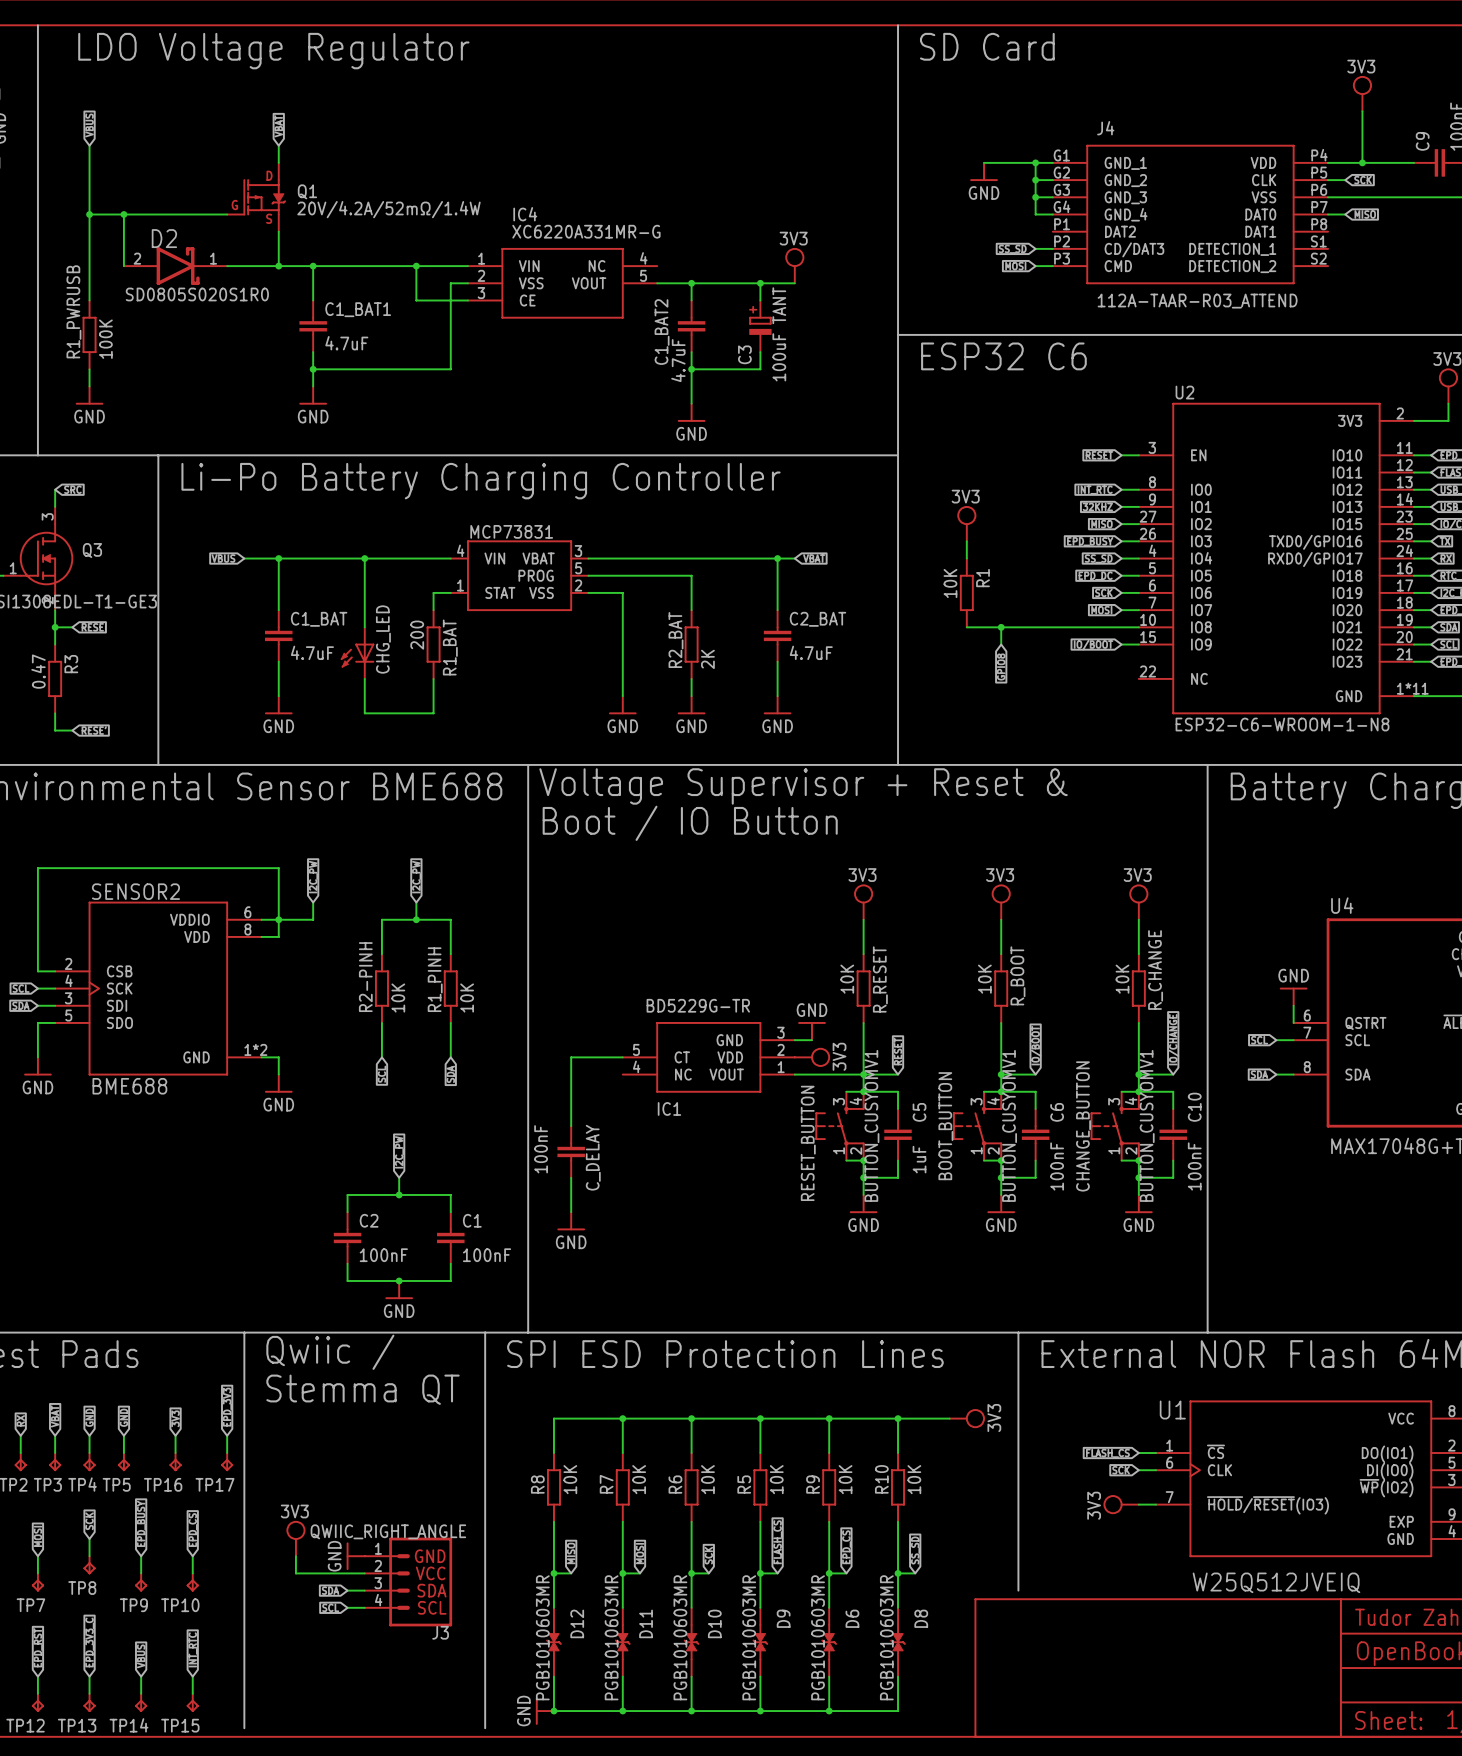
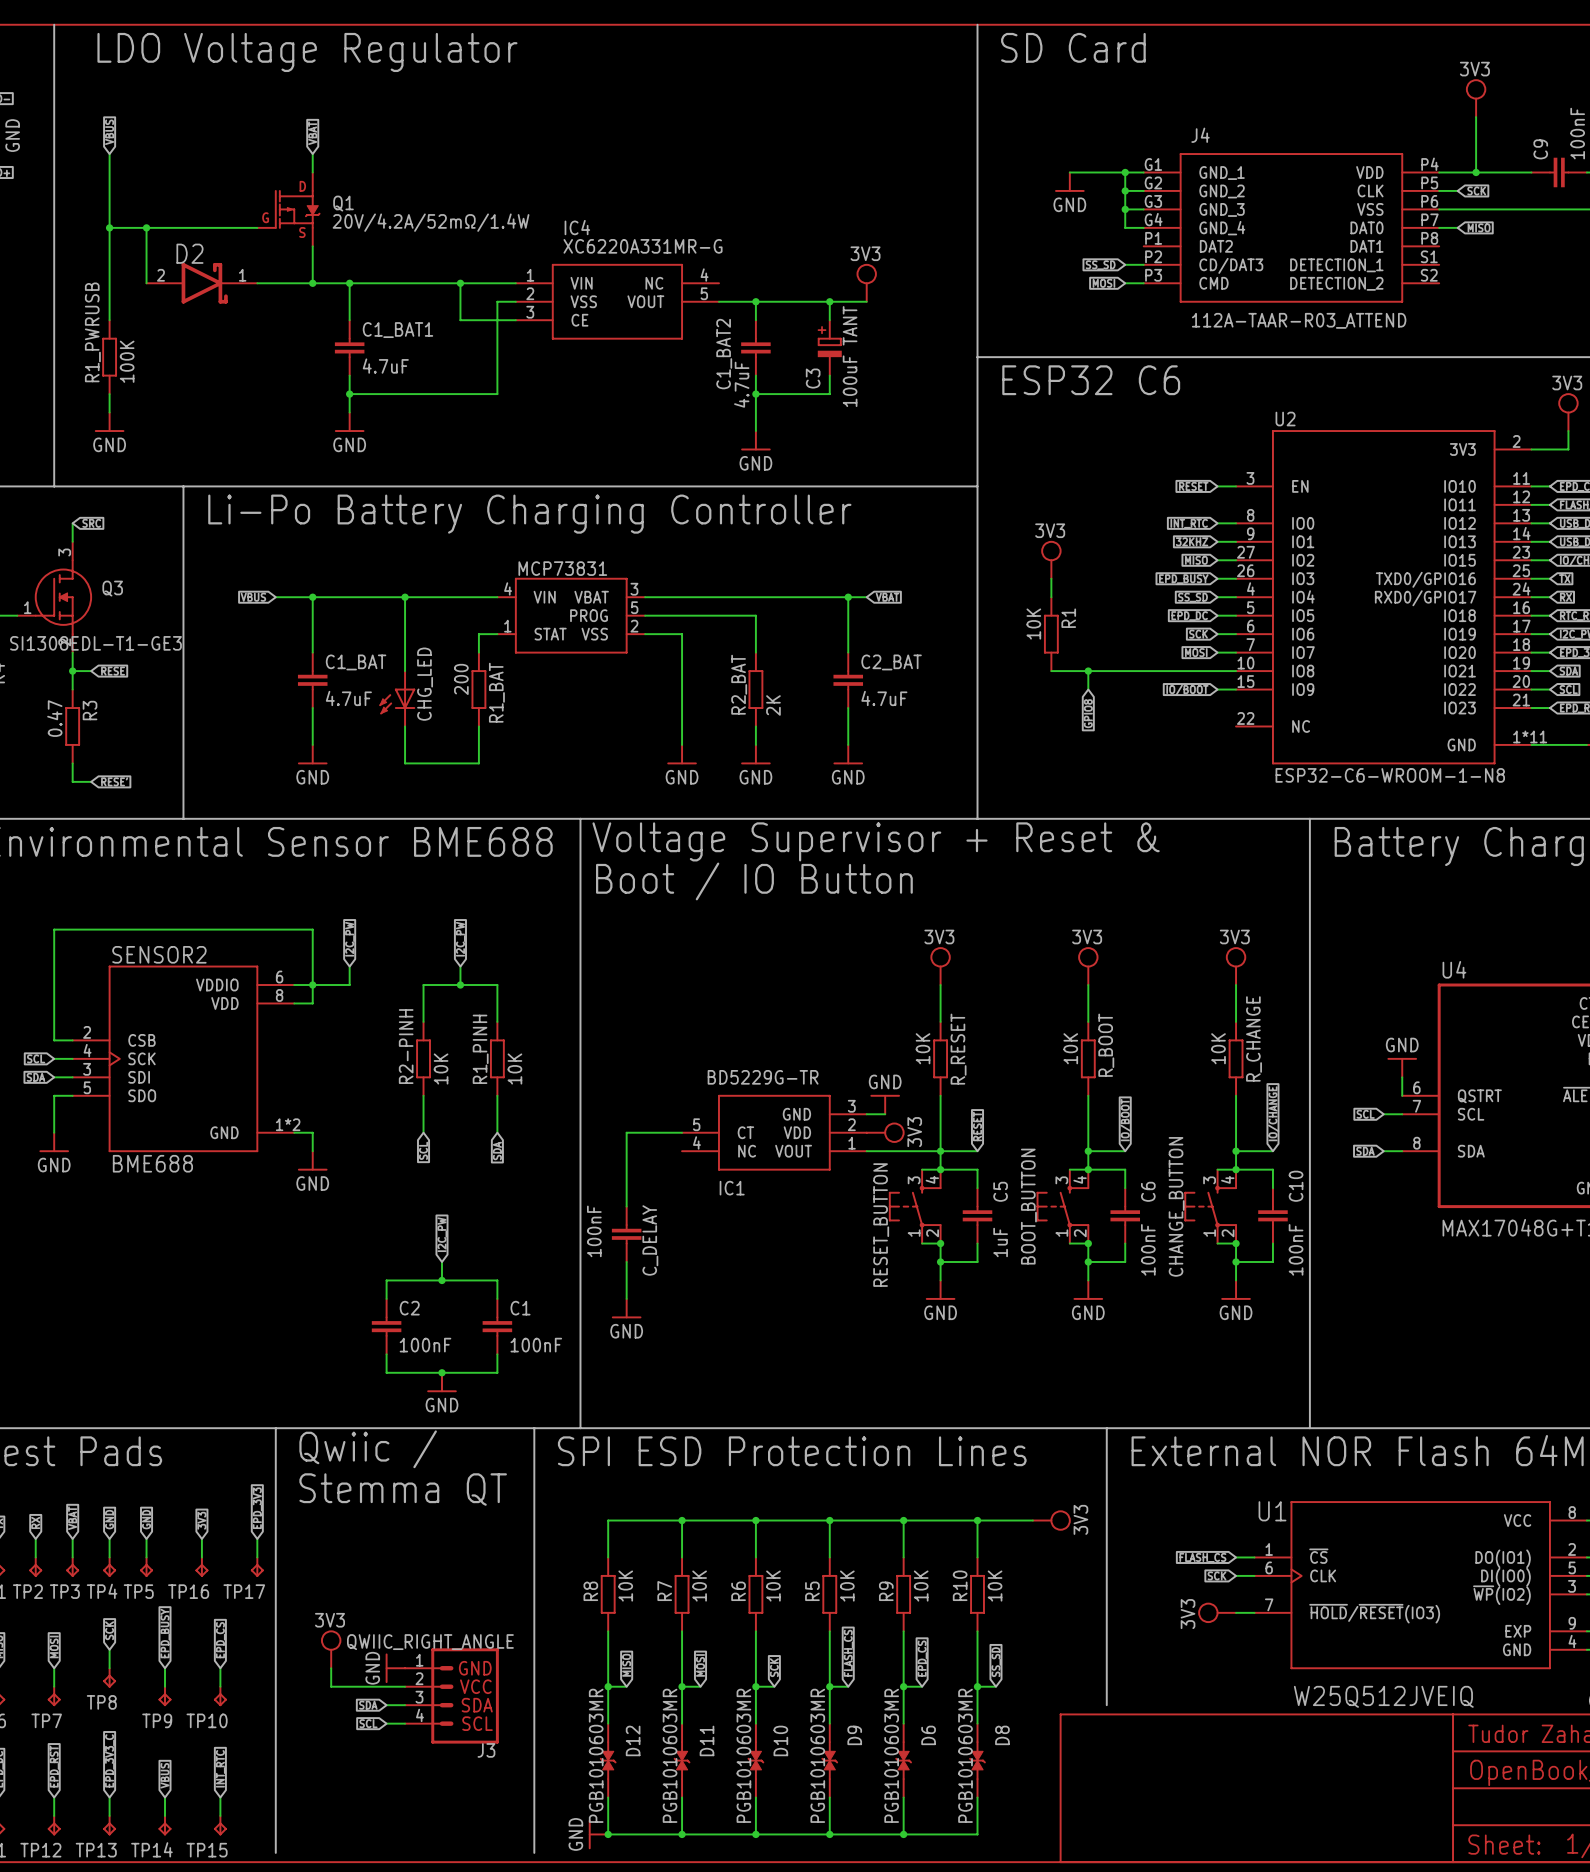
text: SD0805S020S1R0 (197, 294) -> none
RESET_BUTTON value: BUTTON_CUSYOMV1 (871, 1125) -> none
BOOT_BUTTON value: BUTTON_CUSYOMV1 (1009, 1125) -> none
CHANGE_BUTTON value: BUTTON_CUSYOMV1 (1147, 1125) -> none

